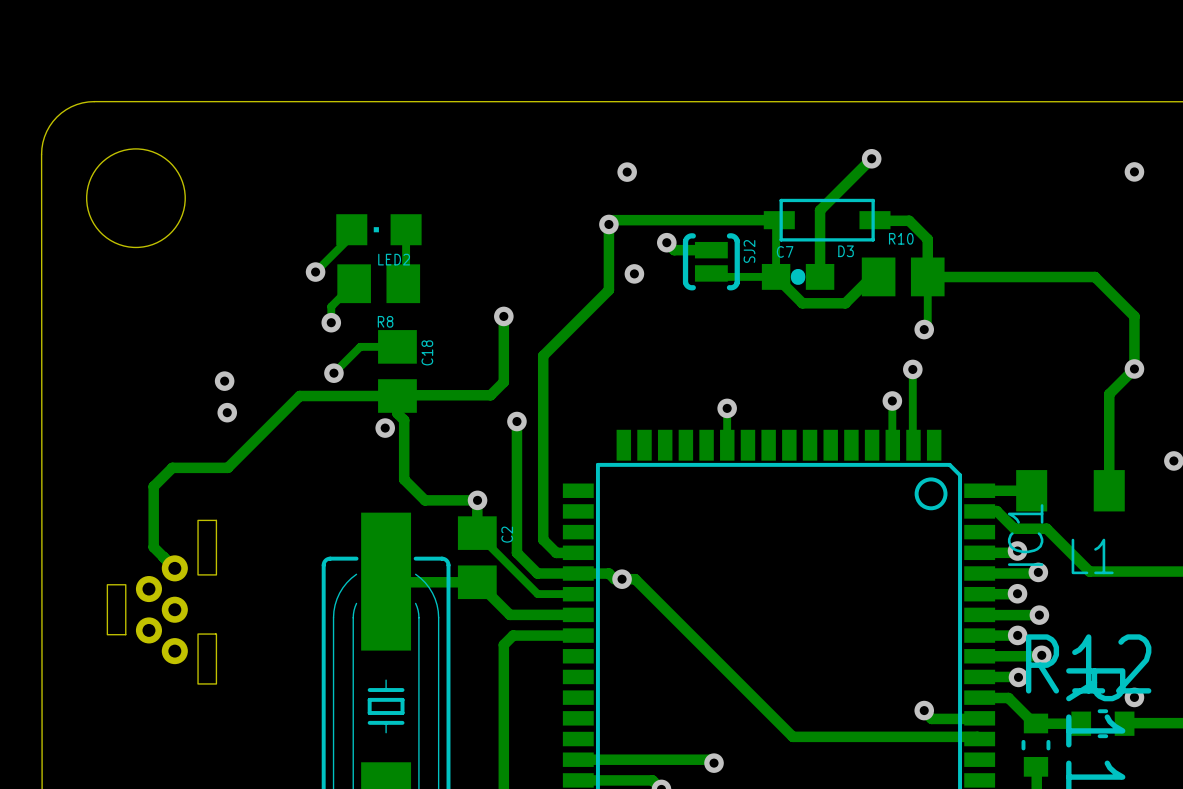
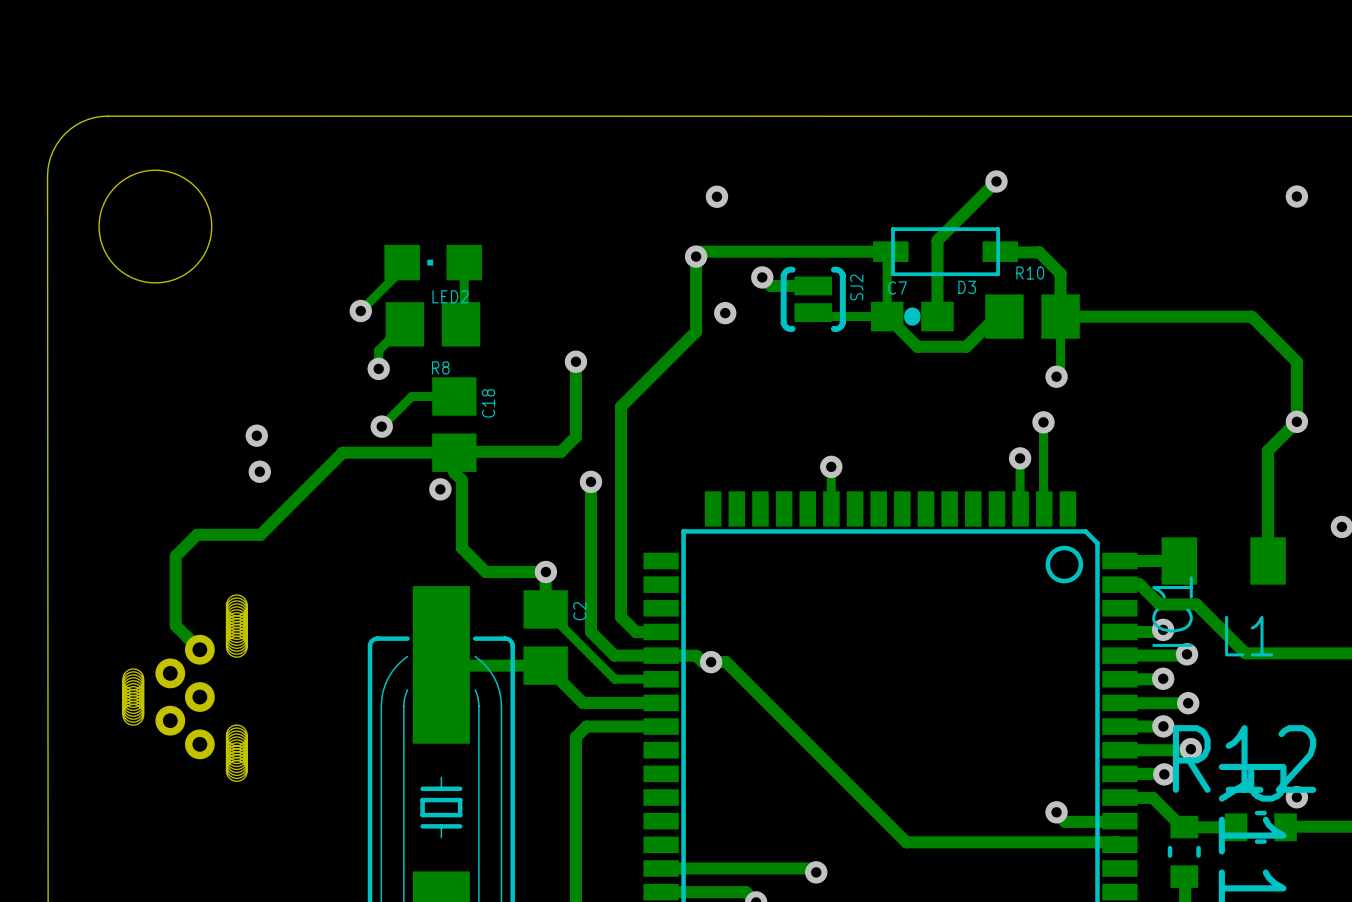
part footprint: [107, 520, 217, 685] -> [122, 595, 248, 782]

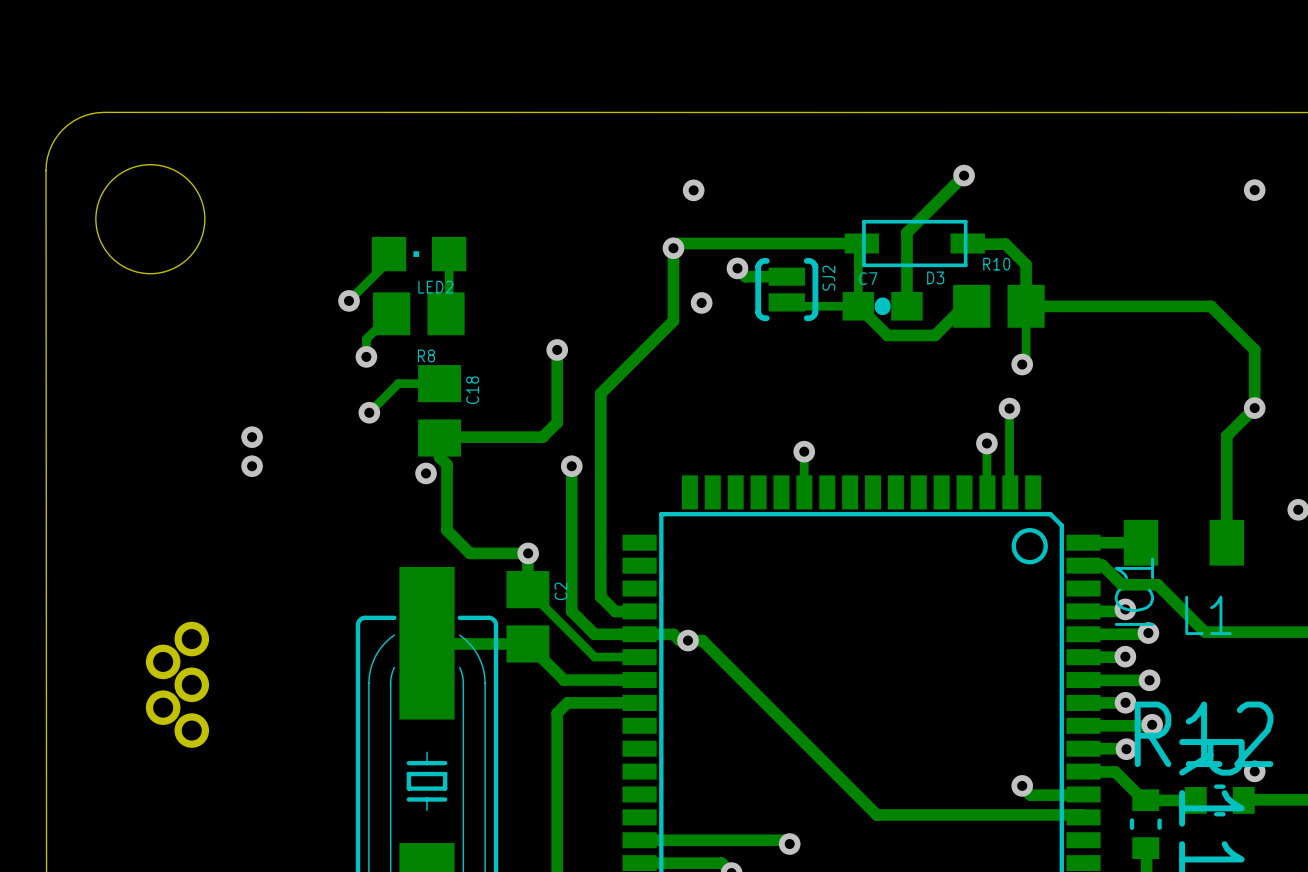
via: (256, 435) -> none
via: none -> (252, 437)
track: (454, 452) (342, 452) (260, 534) (197, 534) (175, 556) (175, 625) (199, 649) -> none
via: (259, 471) -> none
via: none -> (252, 466)
part footprint: [122, 595, 248, 782] -> [145, 621, 210, 748]

